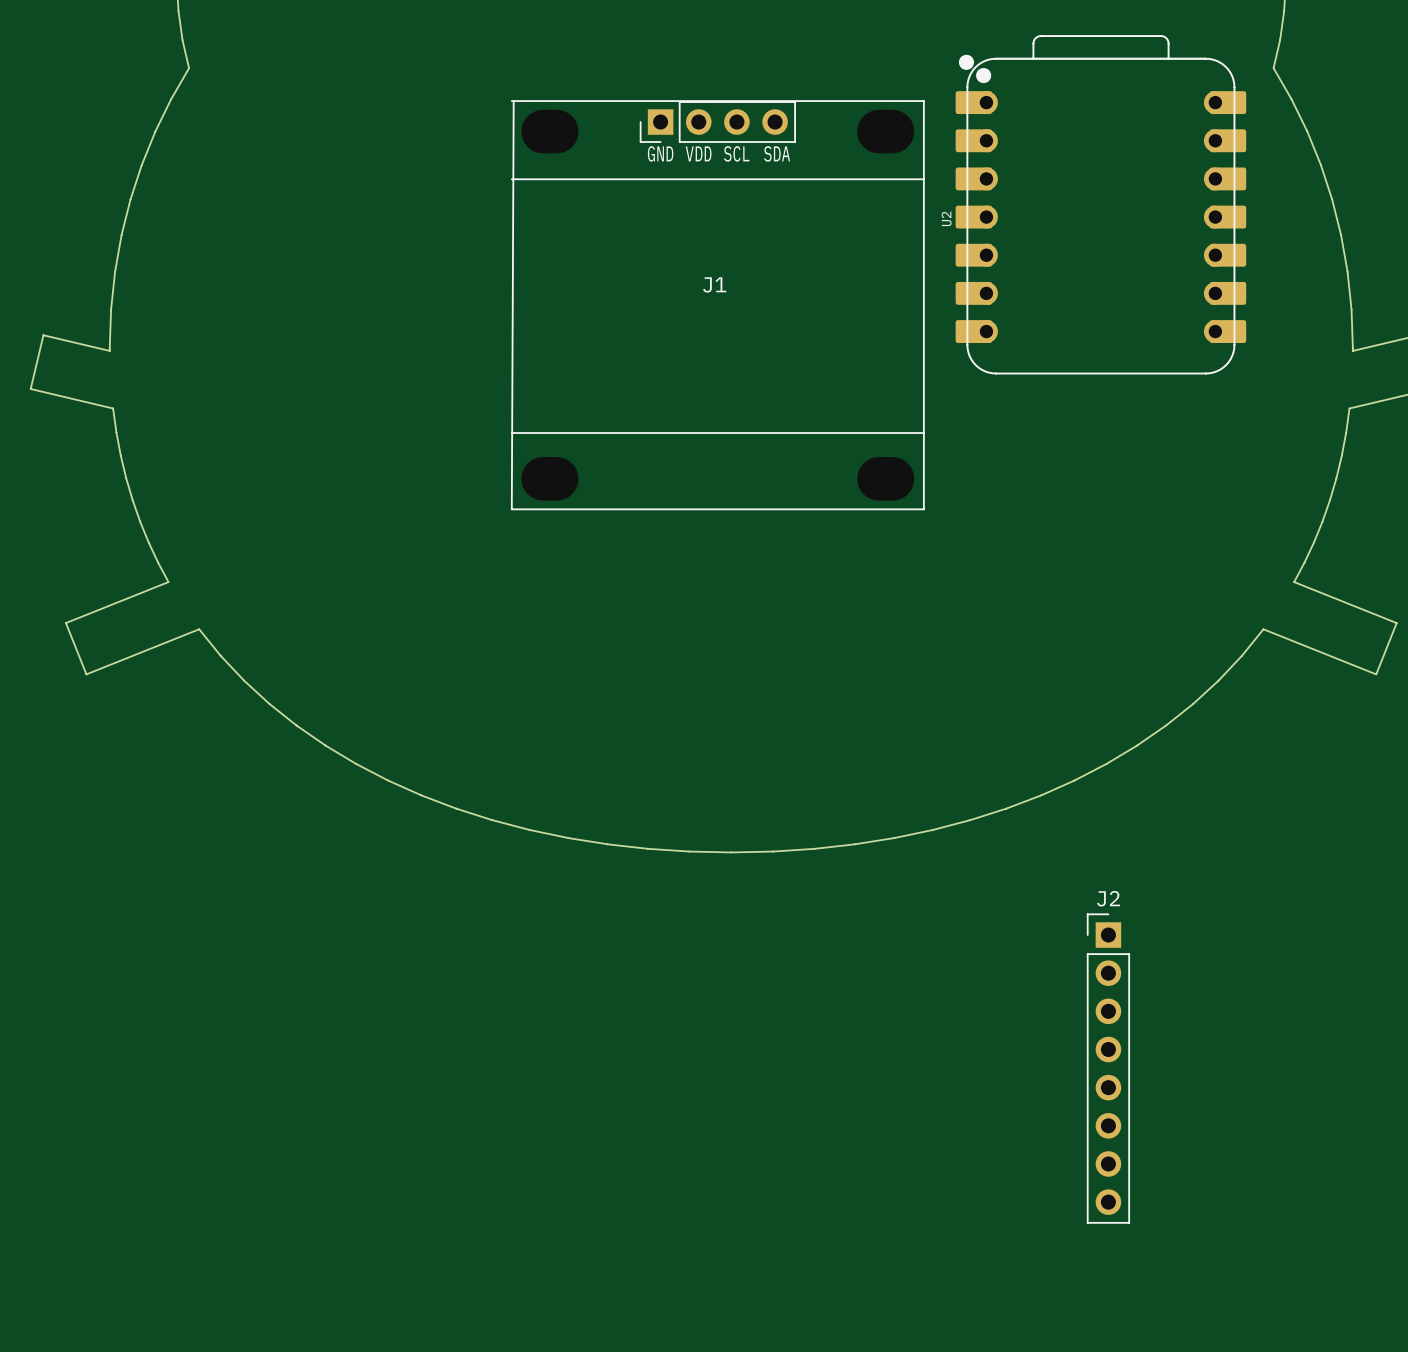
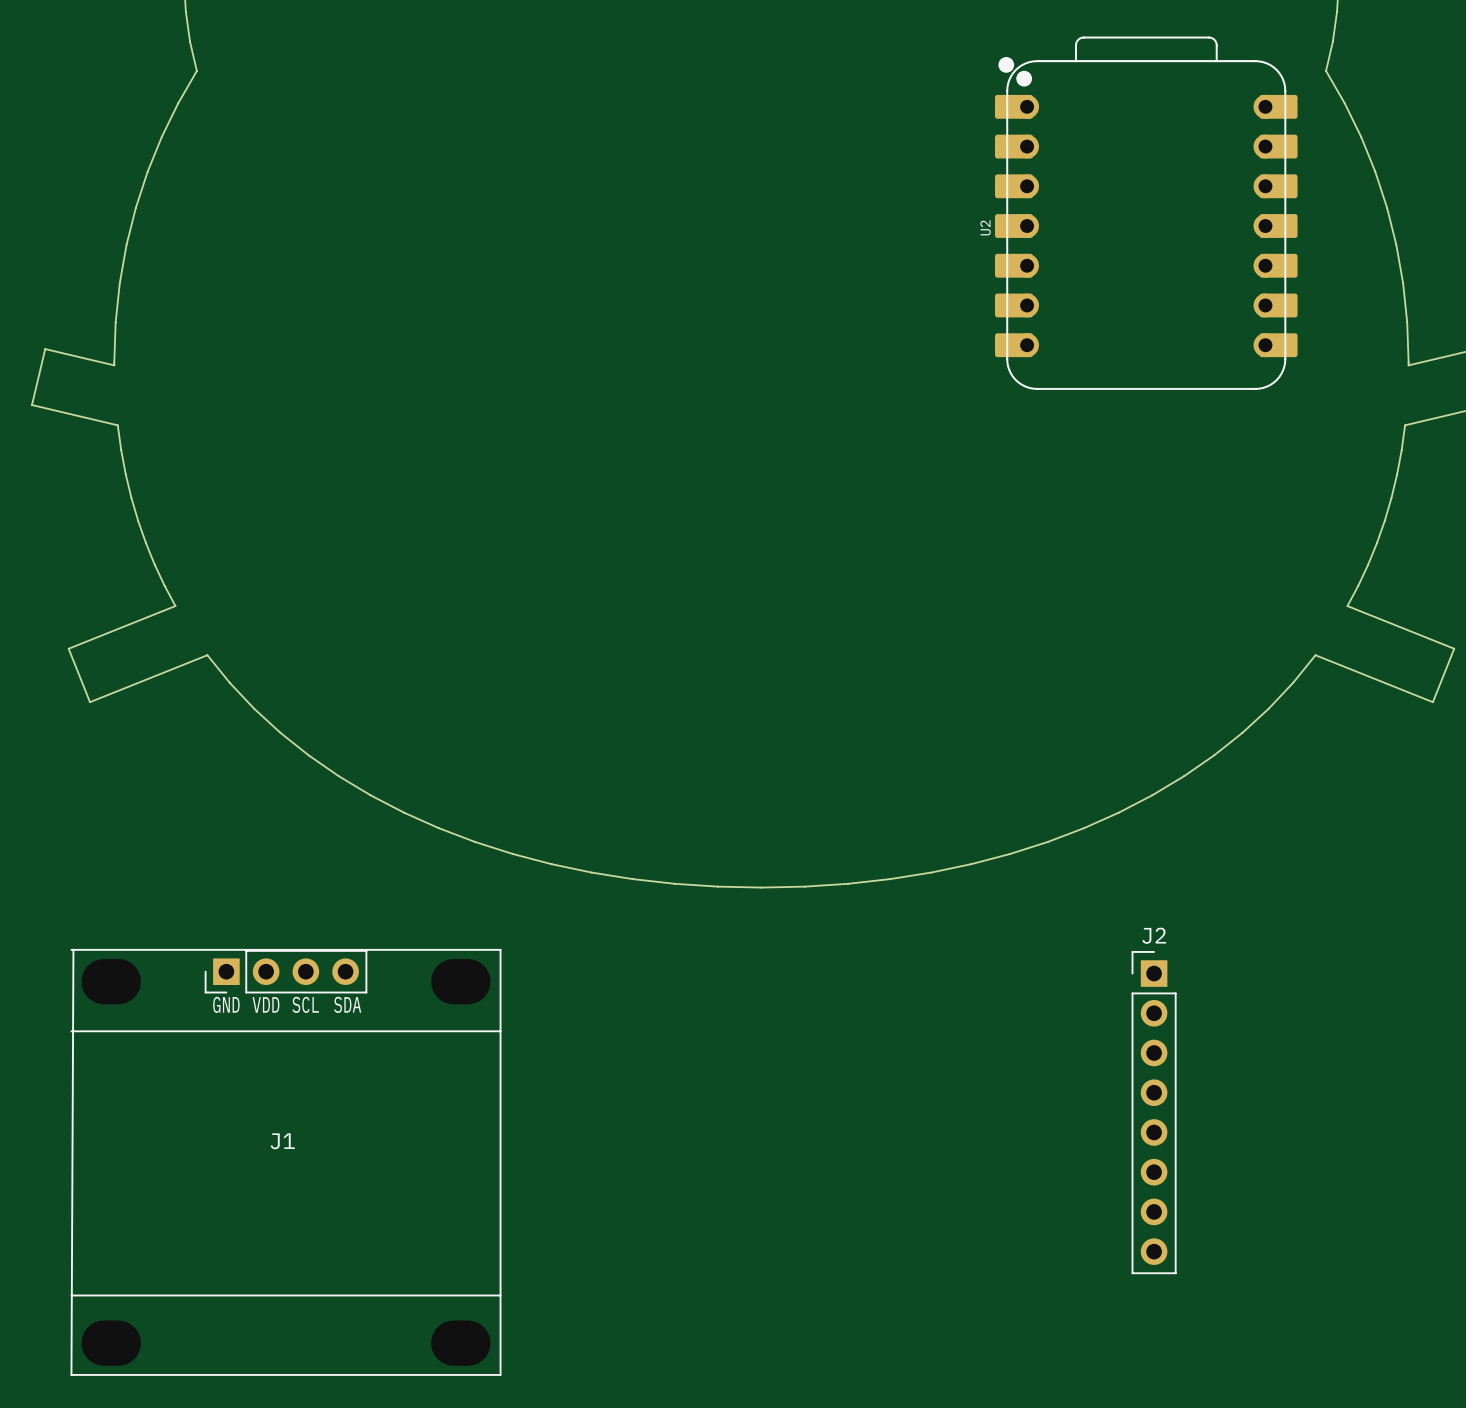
J1 position: (717, 305) -> (285, 1162)

